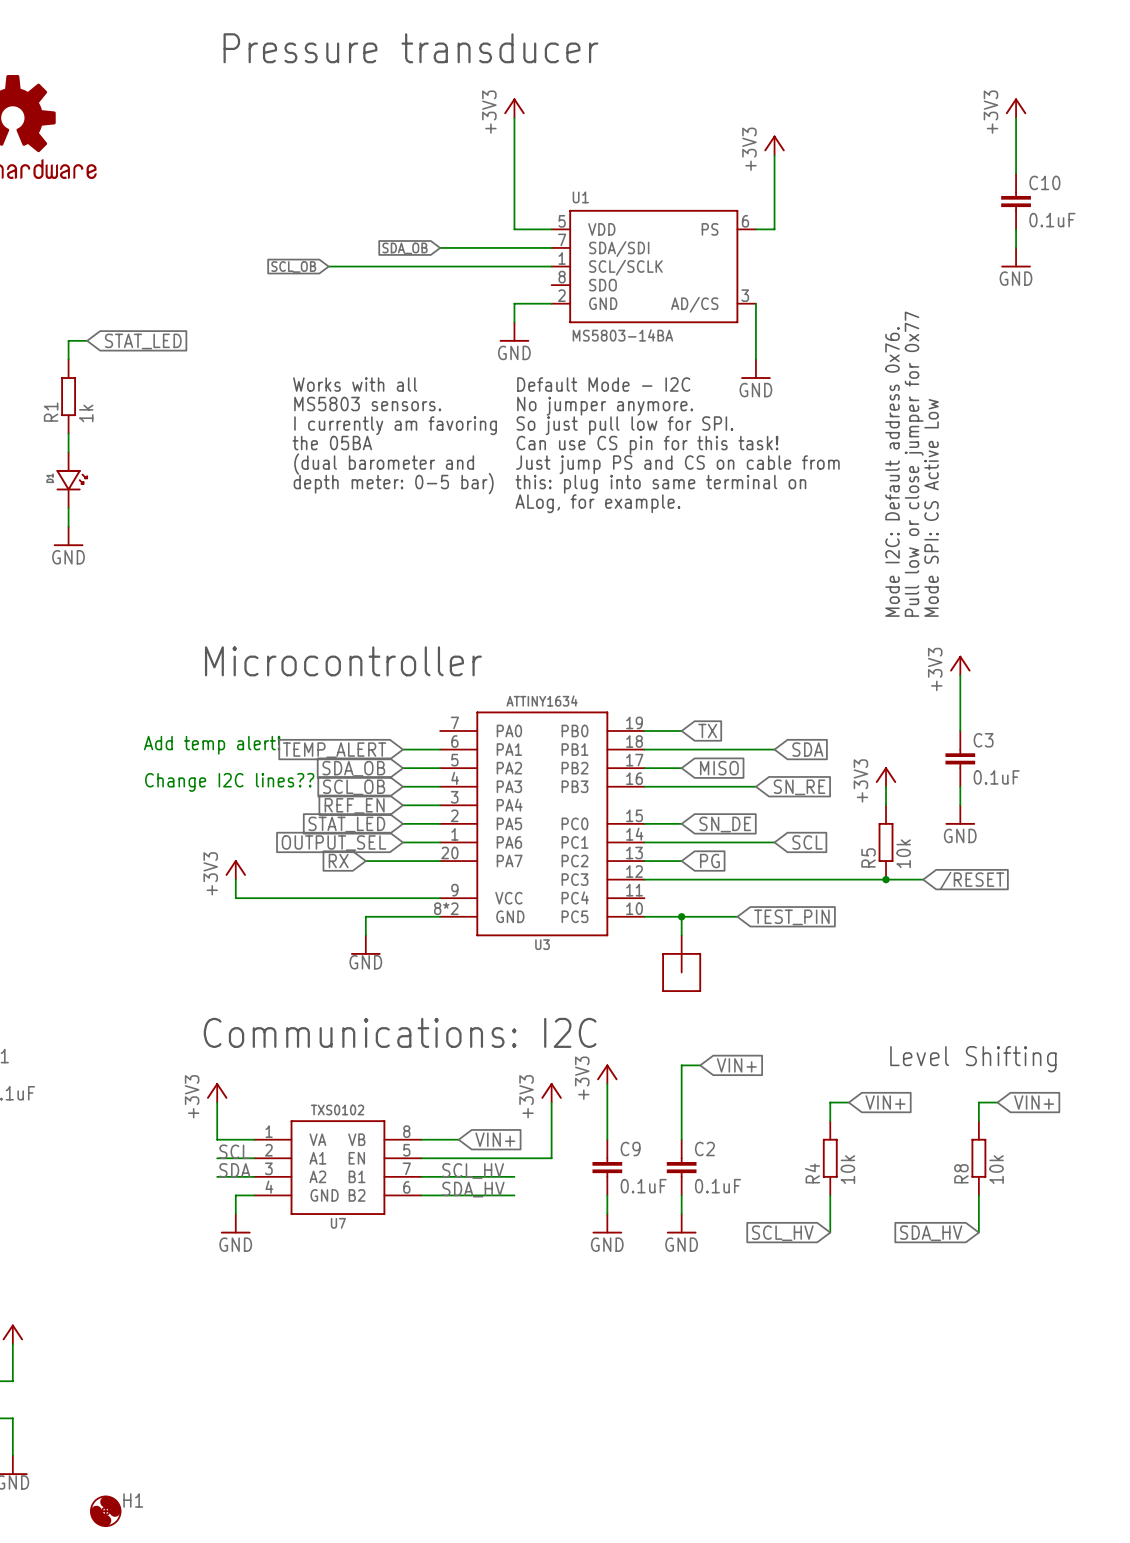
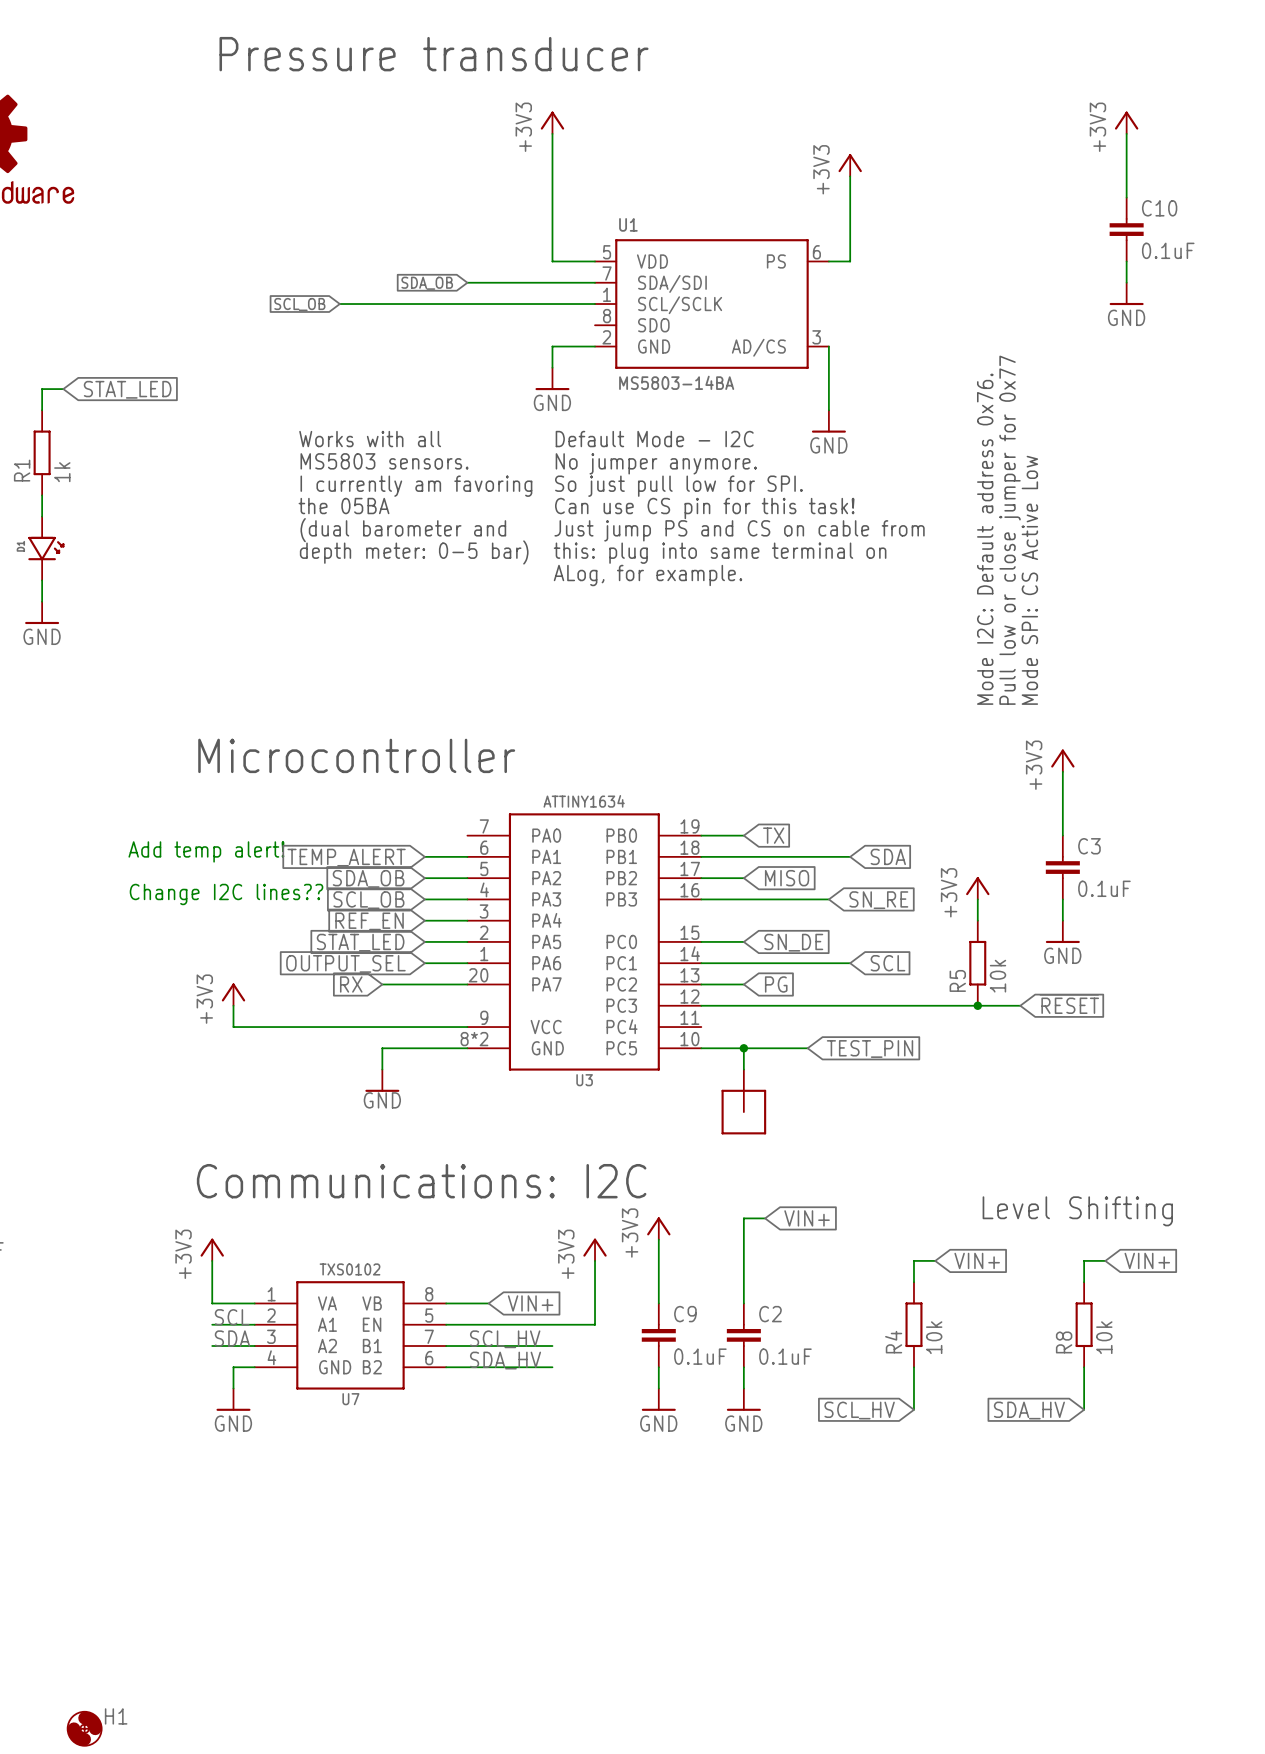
global label: /RESET (972, 880) -> ~{RESET} (1069, 1004)

